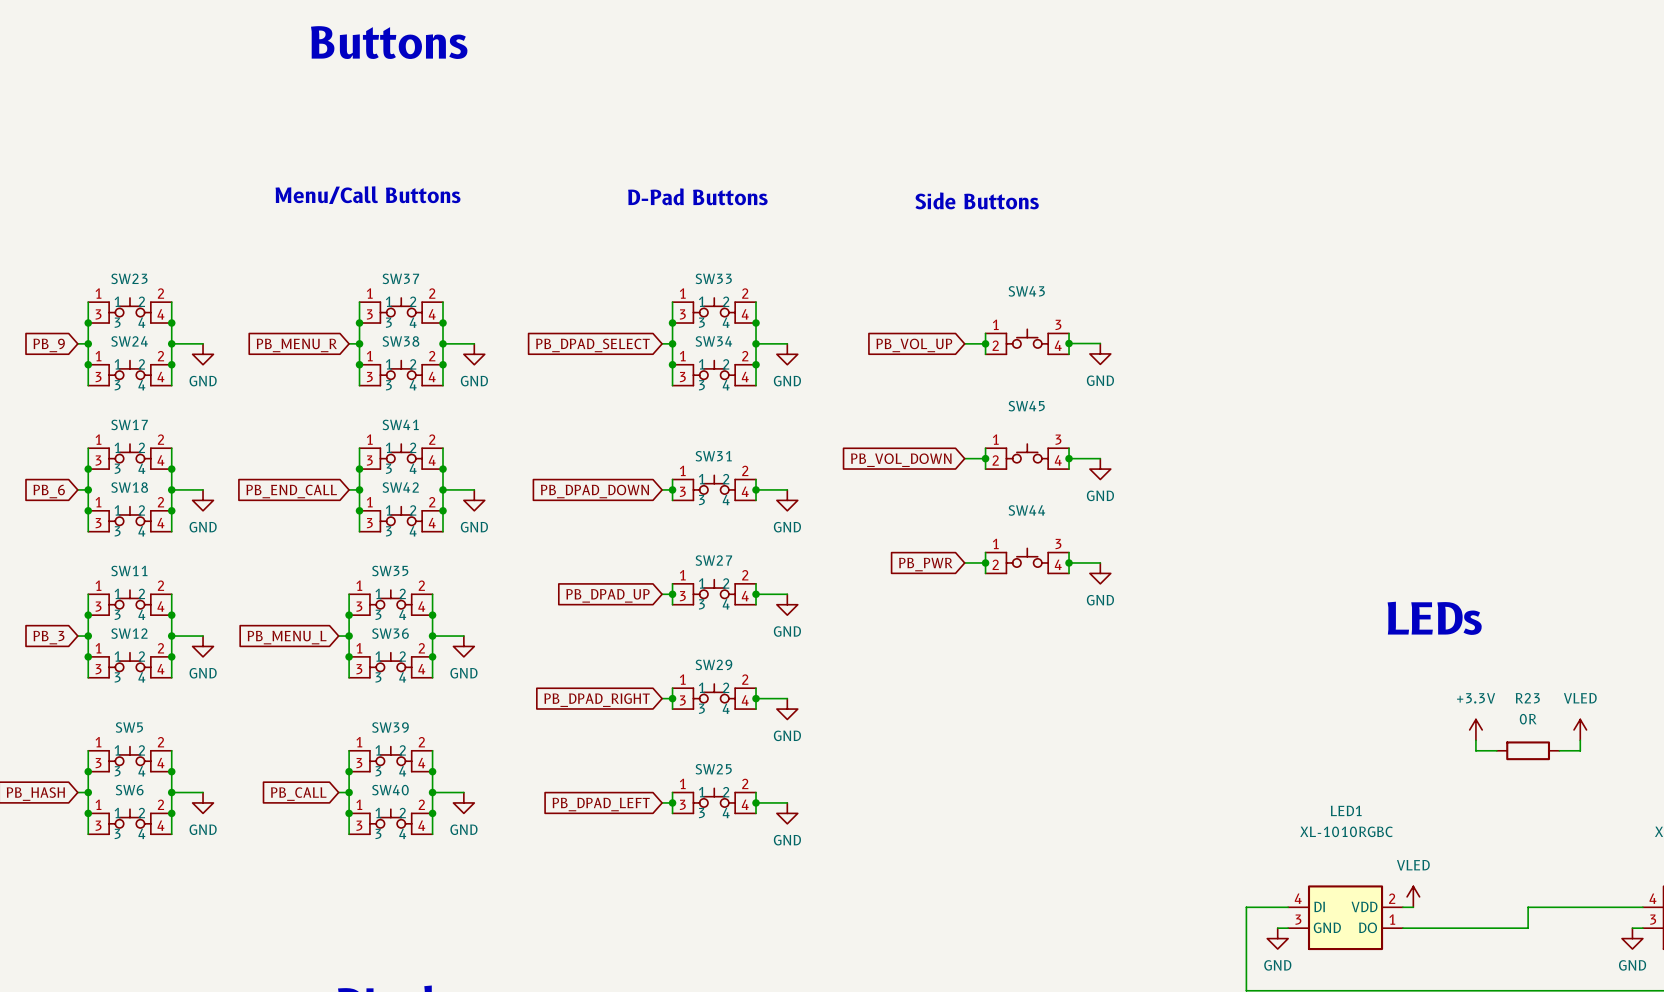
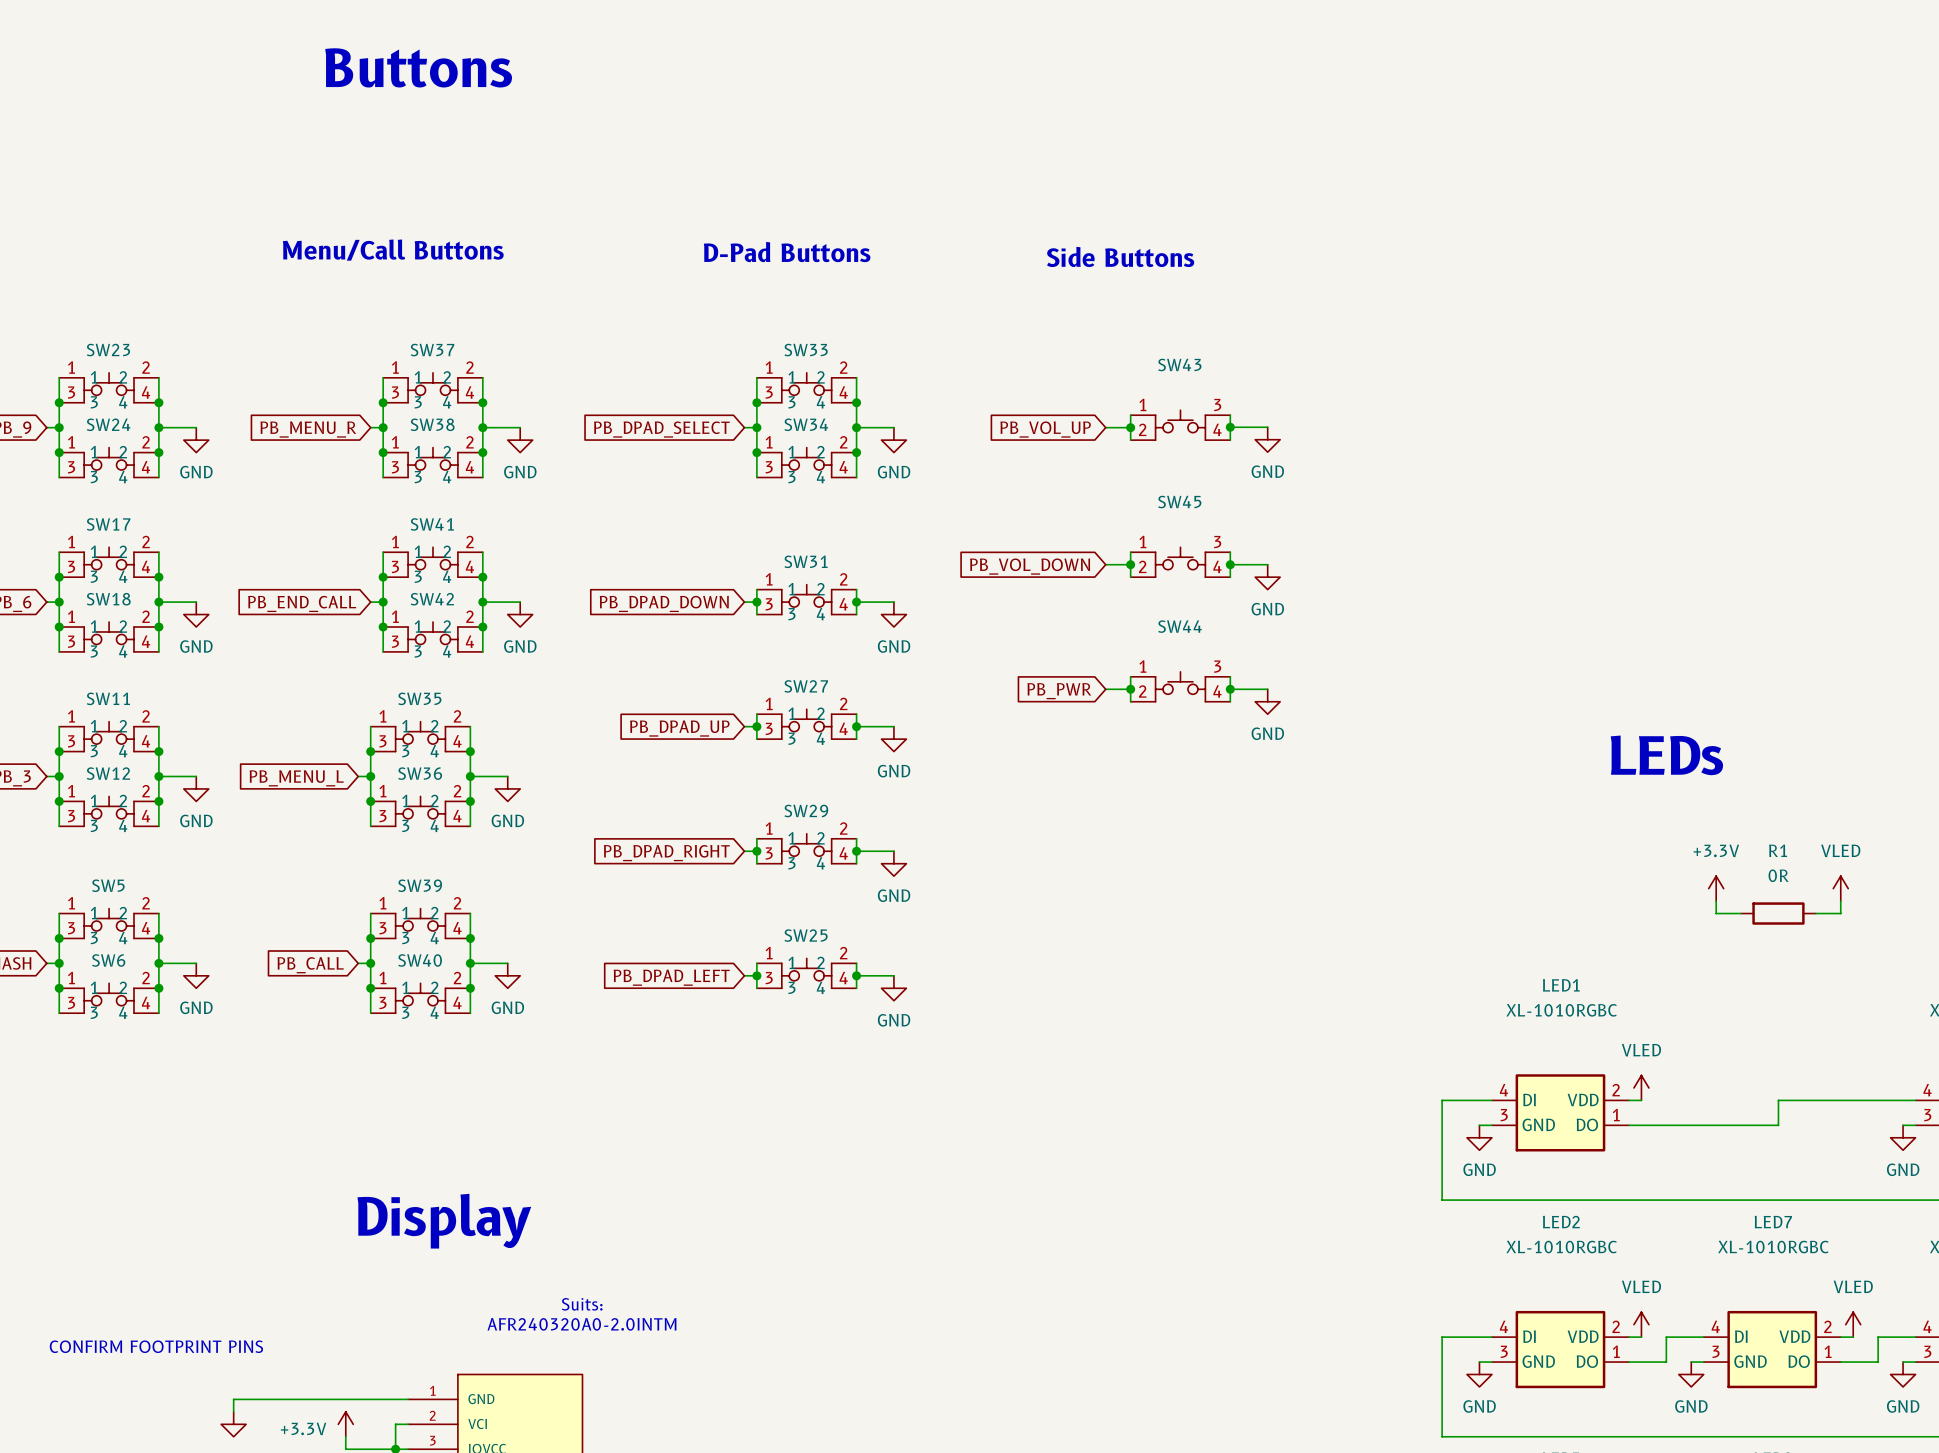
R23 name: R23 (1527, 698) -> R1 (1778, 850)

